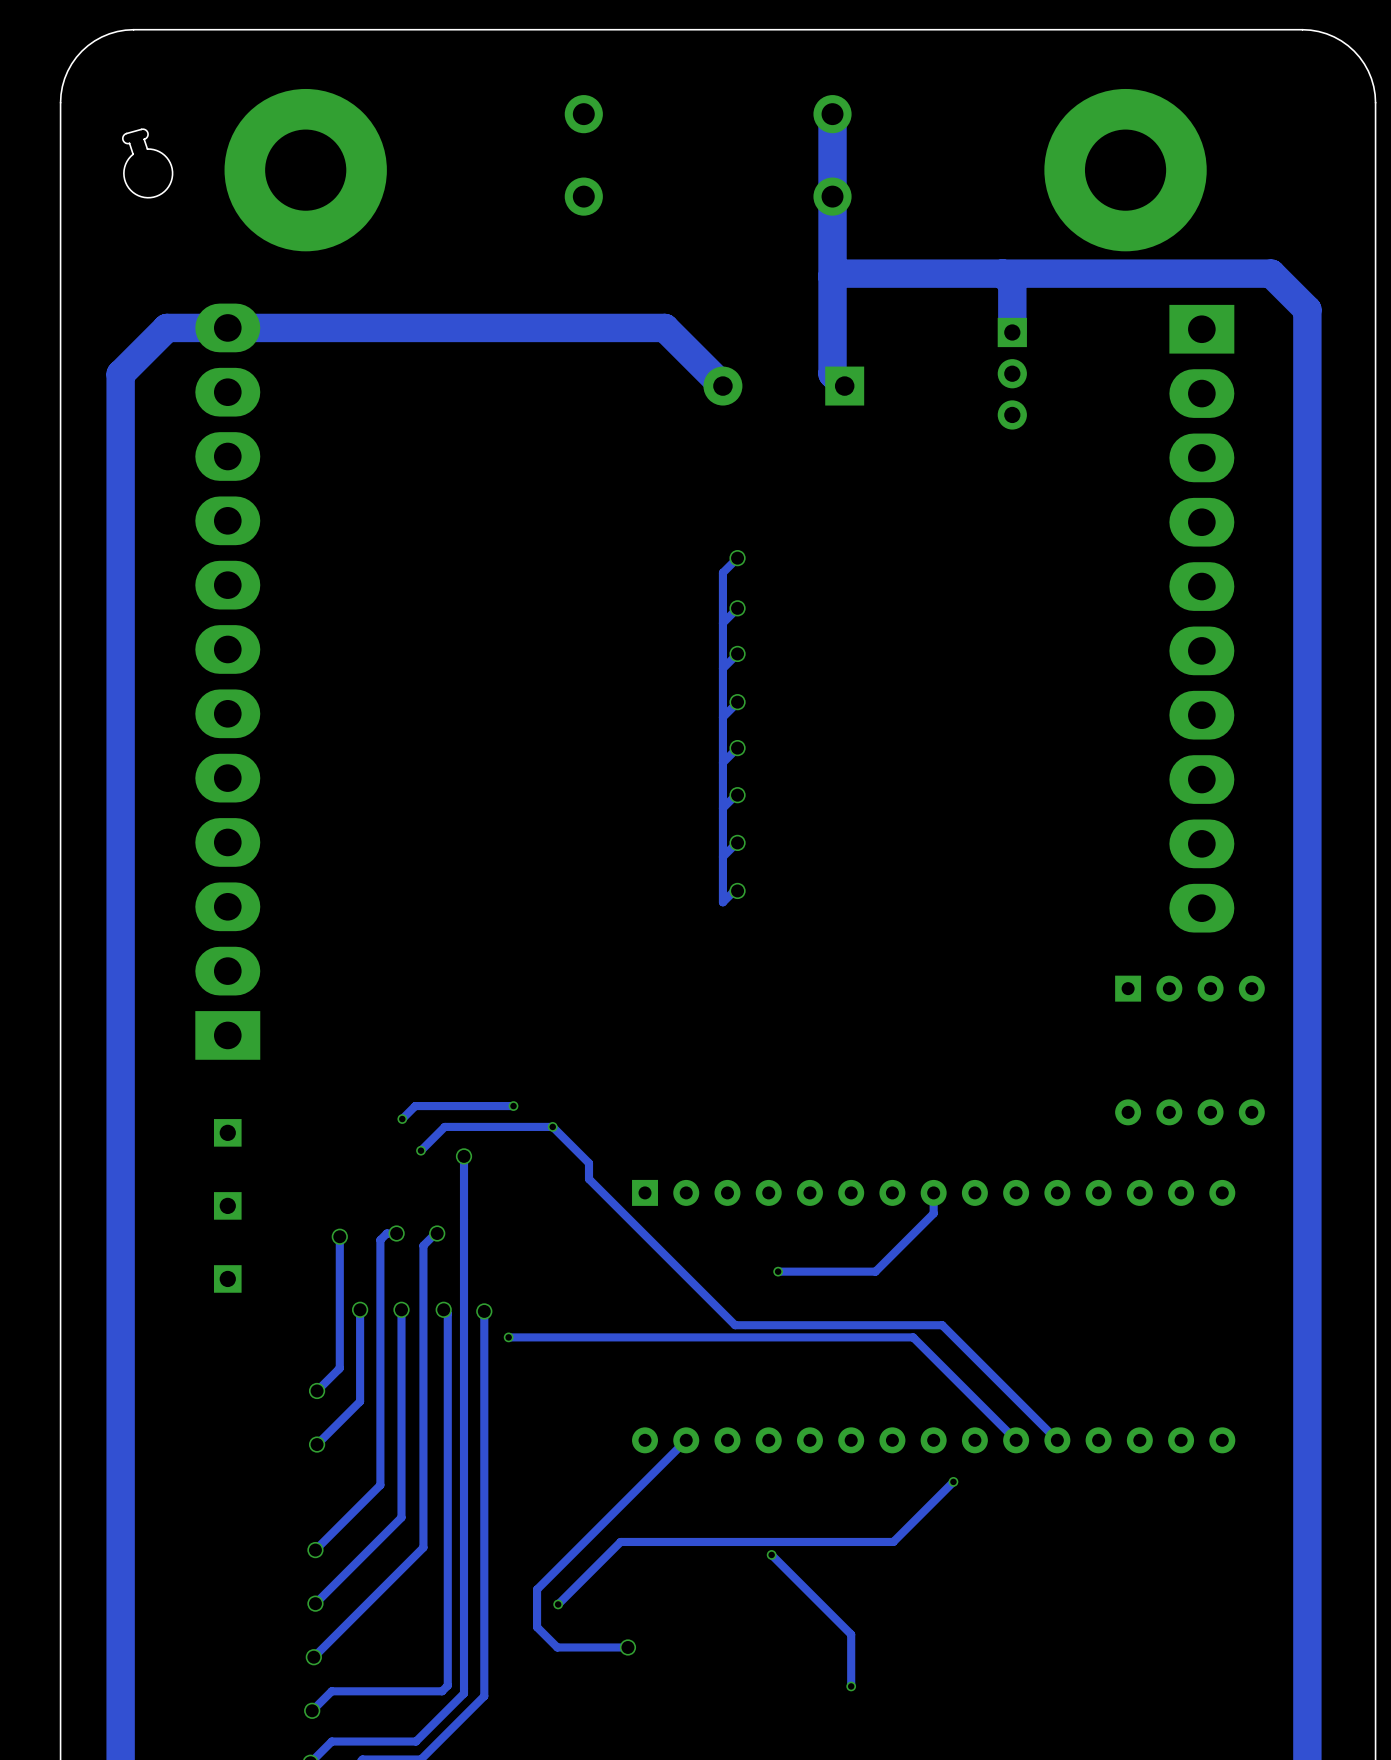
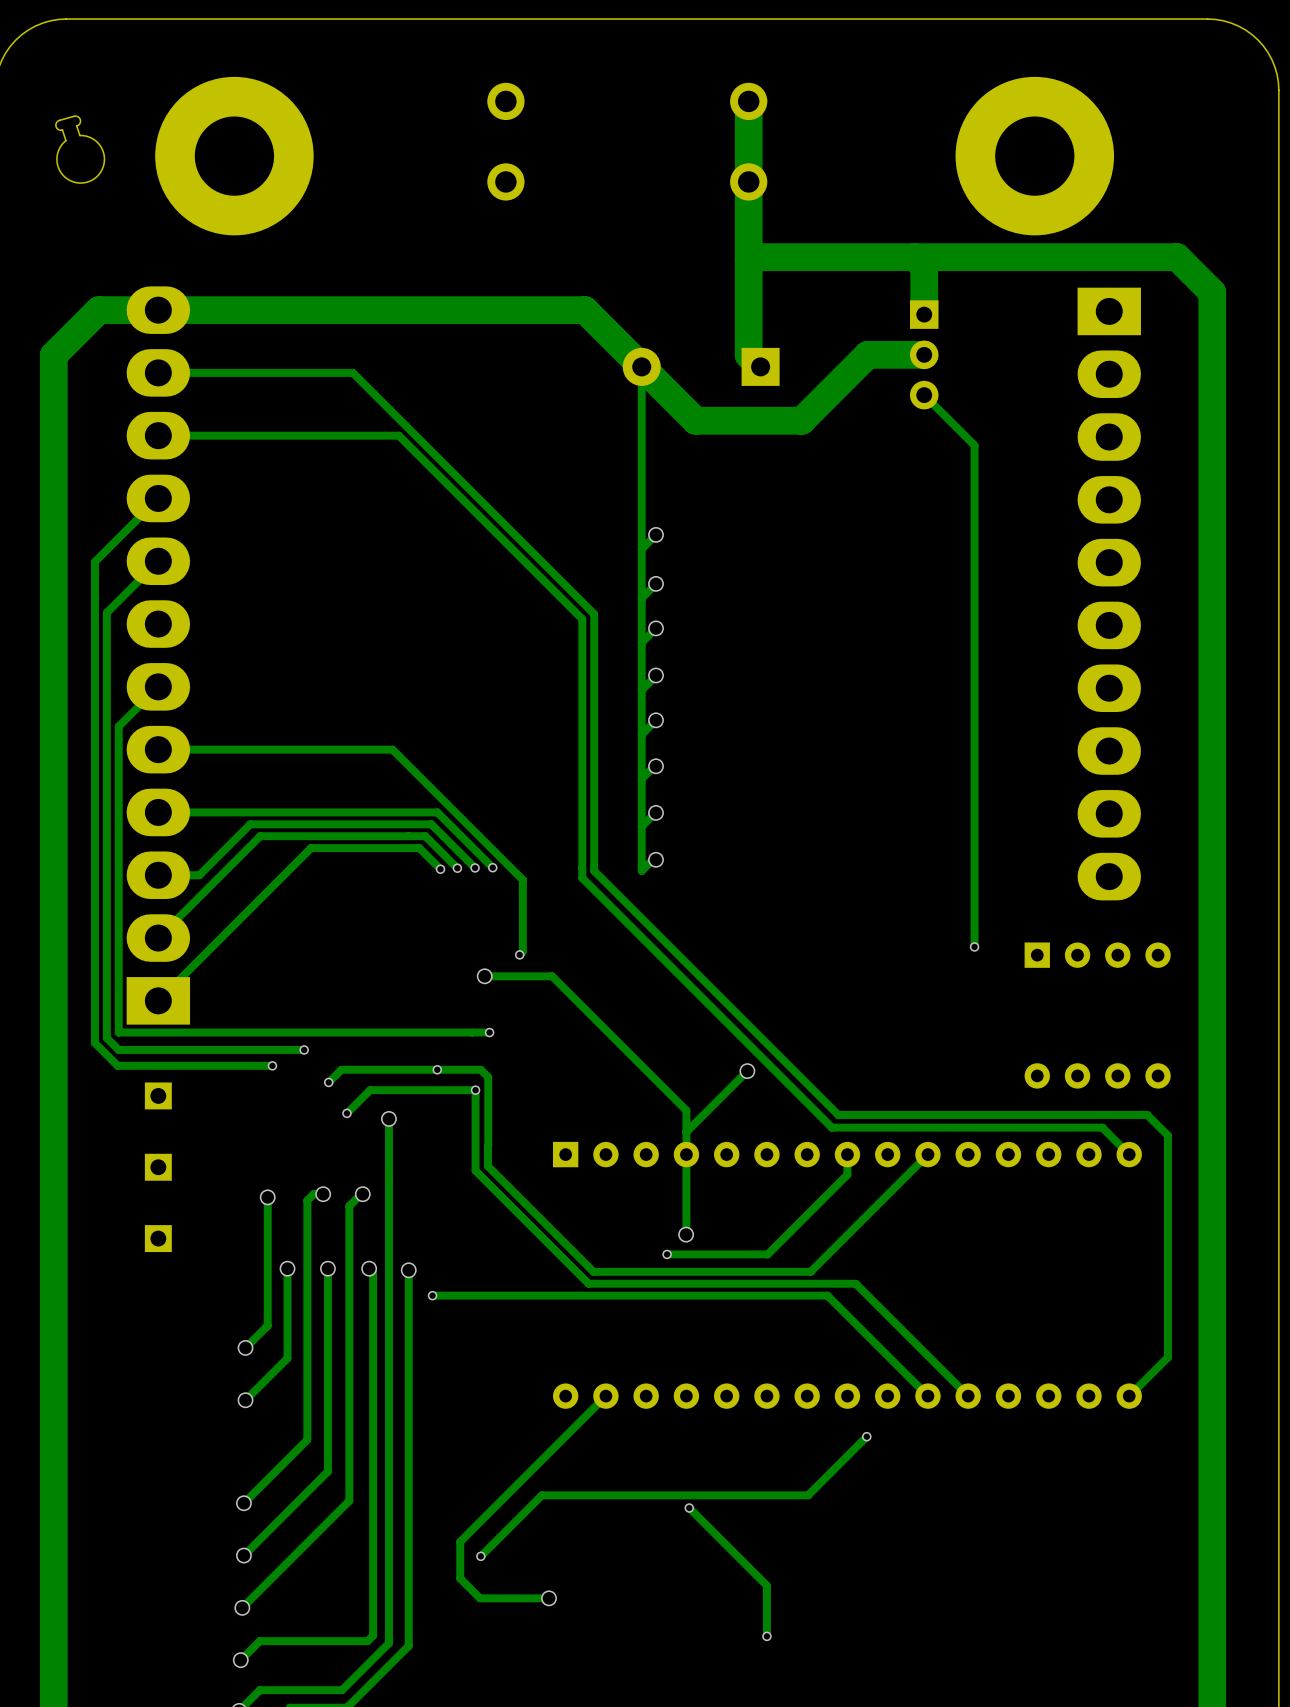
track: none -> (924, 354) (867, 354) (801, 420) (695, 420) (641, 366) (641, 549)
track: none -> (158, 372) (352, 372) (594, 614) (594, 870) (838, 1114) (1147, 1114) (1167, 1135) (1167, 1357) (1129, 1396)
track: none -> (924, 395) (974, 445) (974, 946)
track: none -> (158, 435) (398, 435) (582, 619) (582, 878) (831, 1127) (1102, 1127) (1129, 1154)
track: none -> (158, 498) (94, 561) (94, 1043) (117, 1065) (272, 1065)
track: none -> (158, 561) (106, 612) (106, 1038) (118, 1049) (304, 1049)
track: none -> (158, 686) (118, 726) (118, 1032) (489, 1032)
track: none -> (158, 749) (392, 749) (522, 879) (522, 951) (519, 954)
track: none -> (158, 812) (437, 812) (492, 867)
track: none -> (457, 868) (425, 836) (260, 836) (158, 938)
via: none -> (457, 868)
track: none -> (475, 867) (431, 824) (250, 824) (199, 875) (158, 875)
via: none -> (475, 867)
via: none -> (492, 867)
track: none -> (440, 869) (419, 848) (311, 848) (158, 1000)
via: none -> (440, 869)
via: none -> (974, 946)
via: none -> (519, 954)
track: none -> (484, 976) (552, 976) (686, 1110) (686, 1234)
via: none -> (484, 976)
via: none -> (489, 1032)
via: none -> (304, 1049)
via: none -> (272, 1065)
track: none -> (437, 1069) (480, 1069) (488, 1077) (488, 1166) (593, 1271) (810, 1271) (927, 1154)
track: none -> (747, 1071) (686, 1132)
via: none -> (747, 1071)
track: (552, 1126) (589, 1163) (589, 1179) (735, 1325) -> (475, 1090) (475, 1170) (588, 1283) (653, 1283)
via position: (778, 1271) -> (667, 1254)
track: (875, 1271) (778, 1271) -> (790, 1231) (767, 1254) (667, 1254)
via: none -> (686, 1234)

